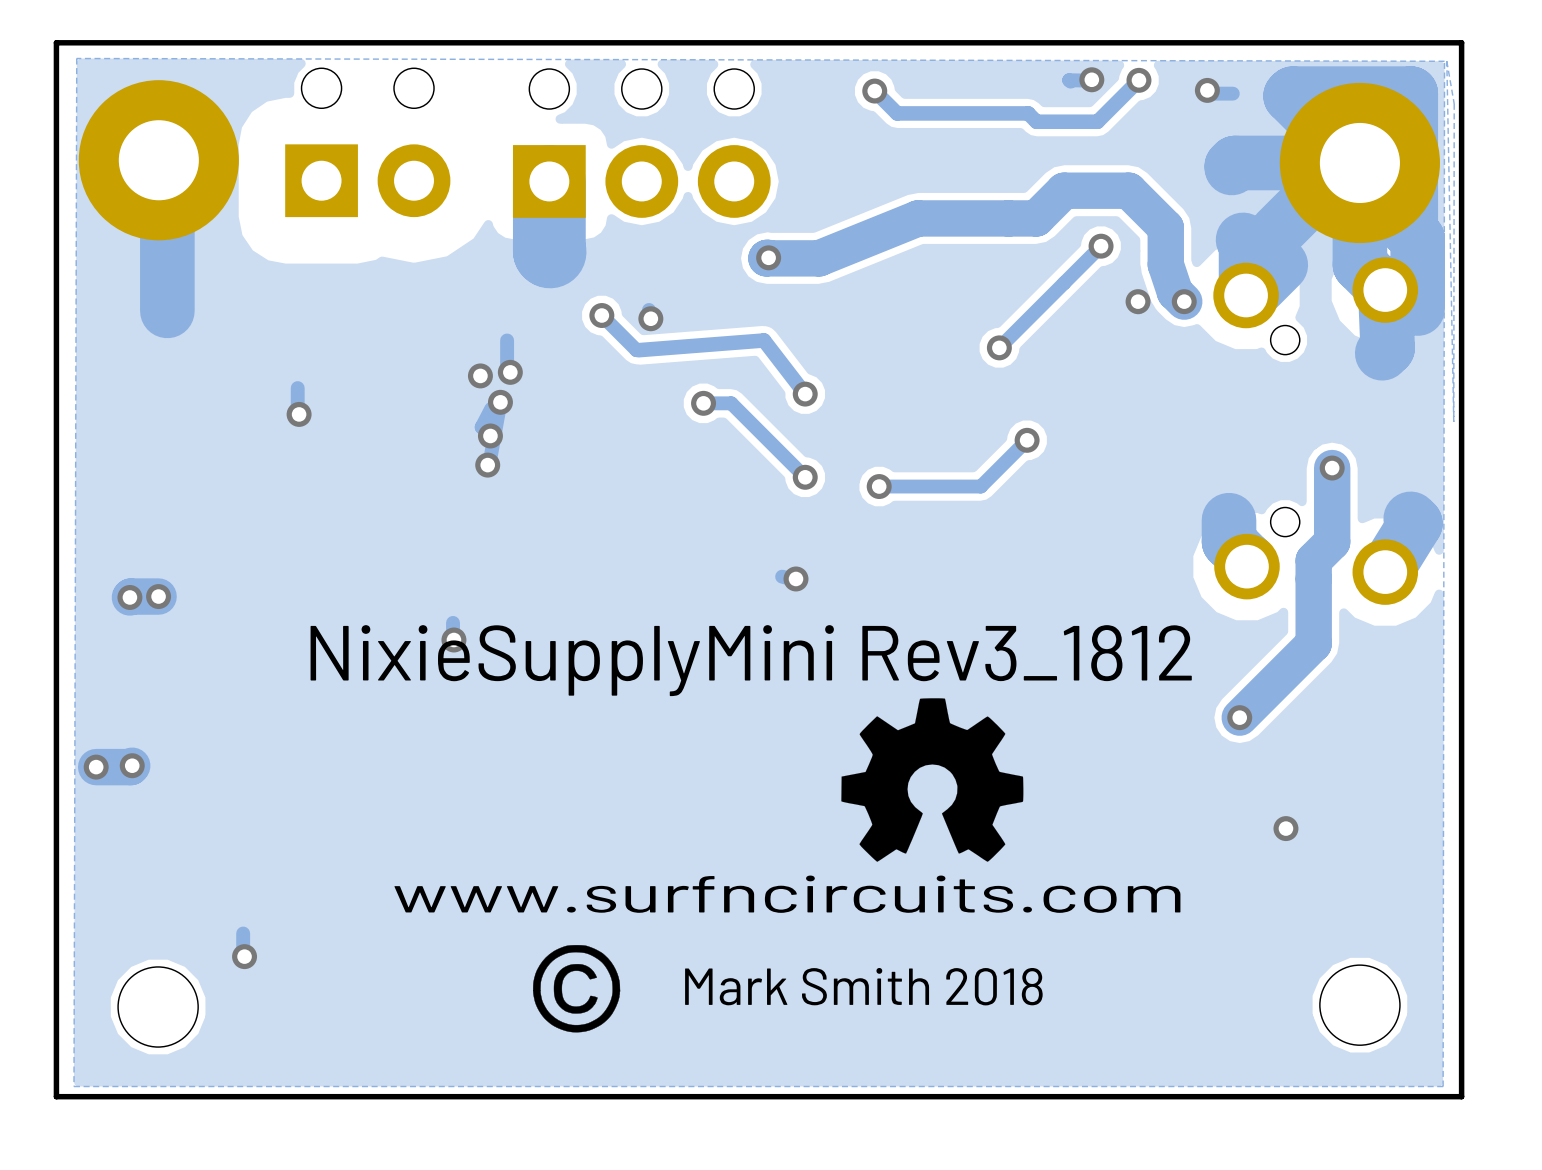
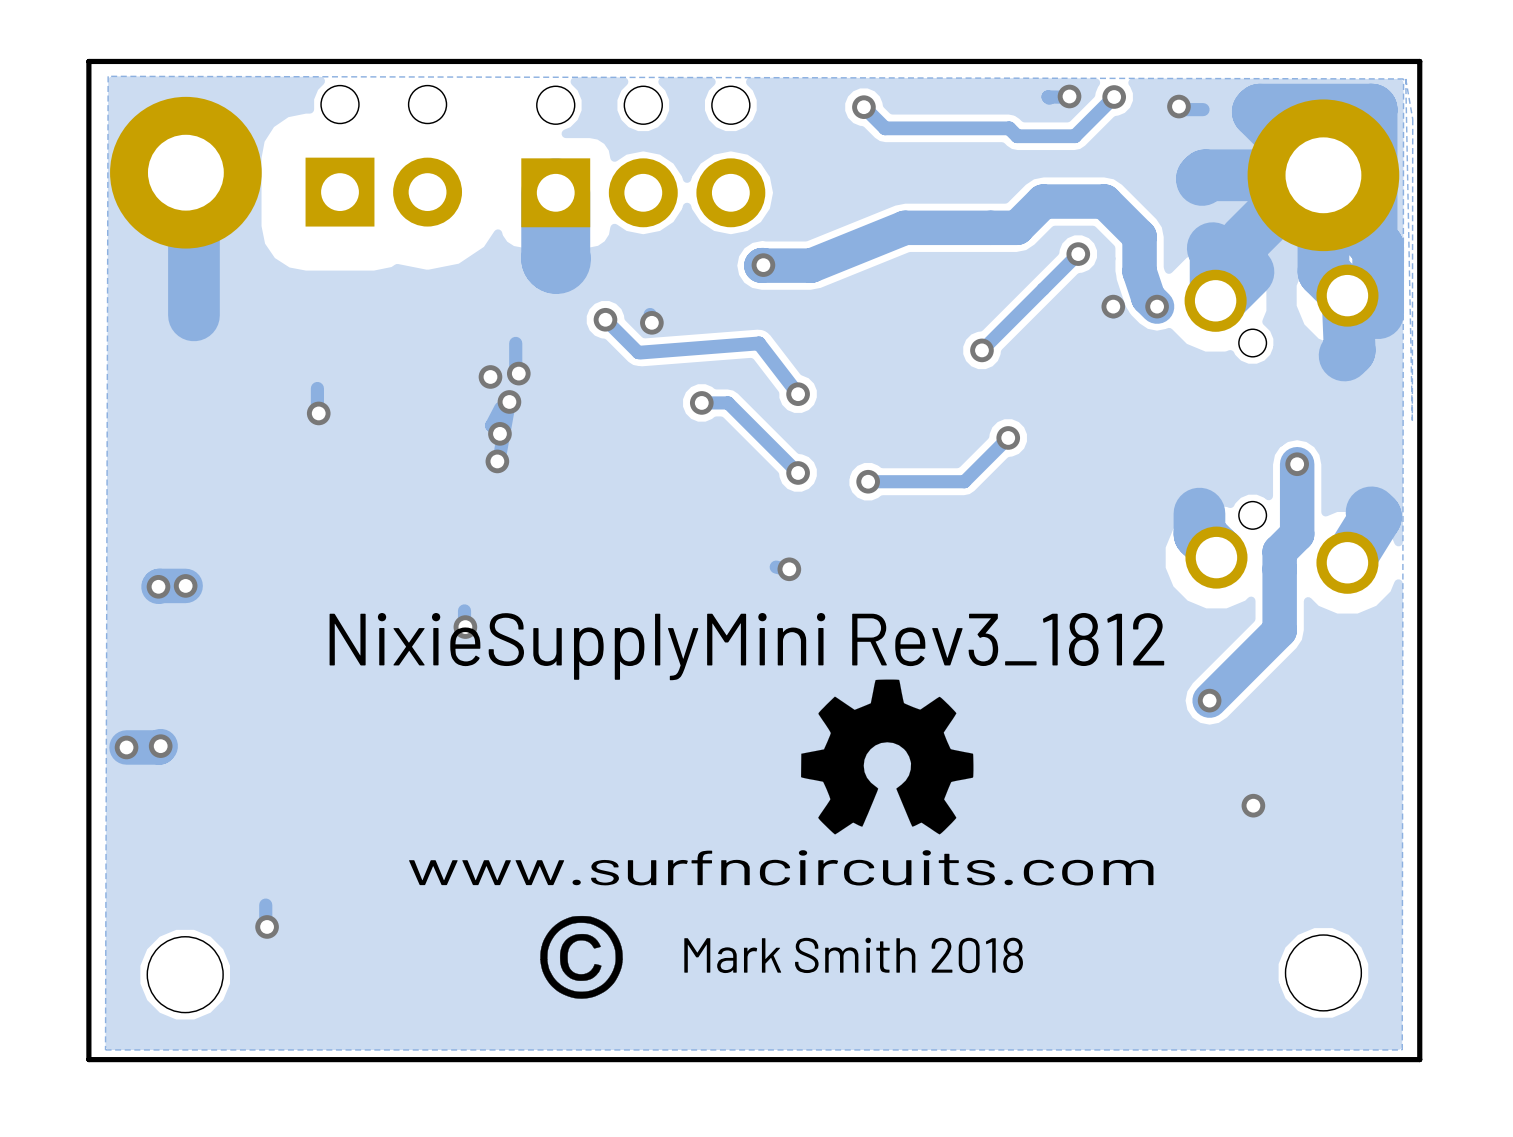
drawing position: (932, 780) -> (887, 757)

